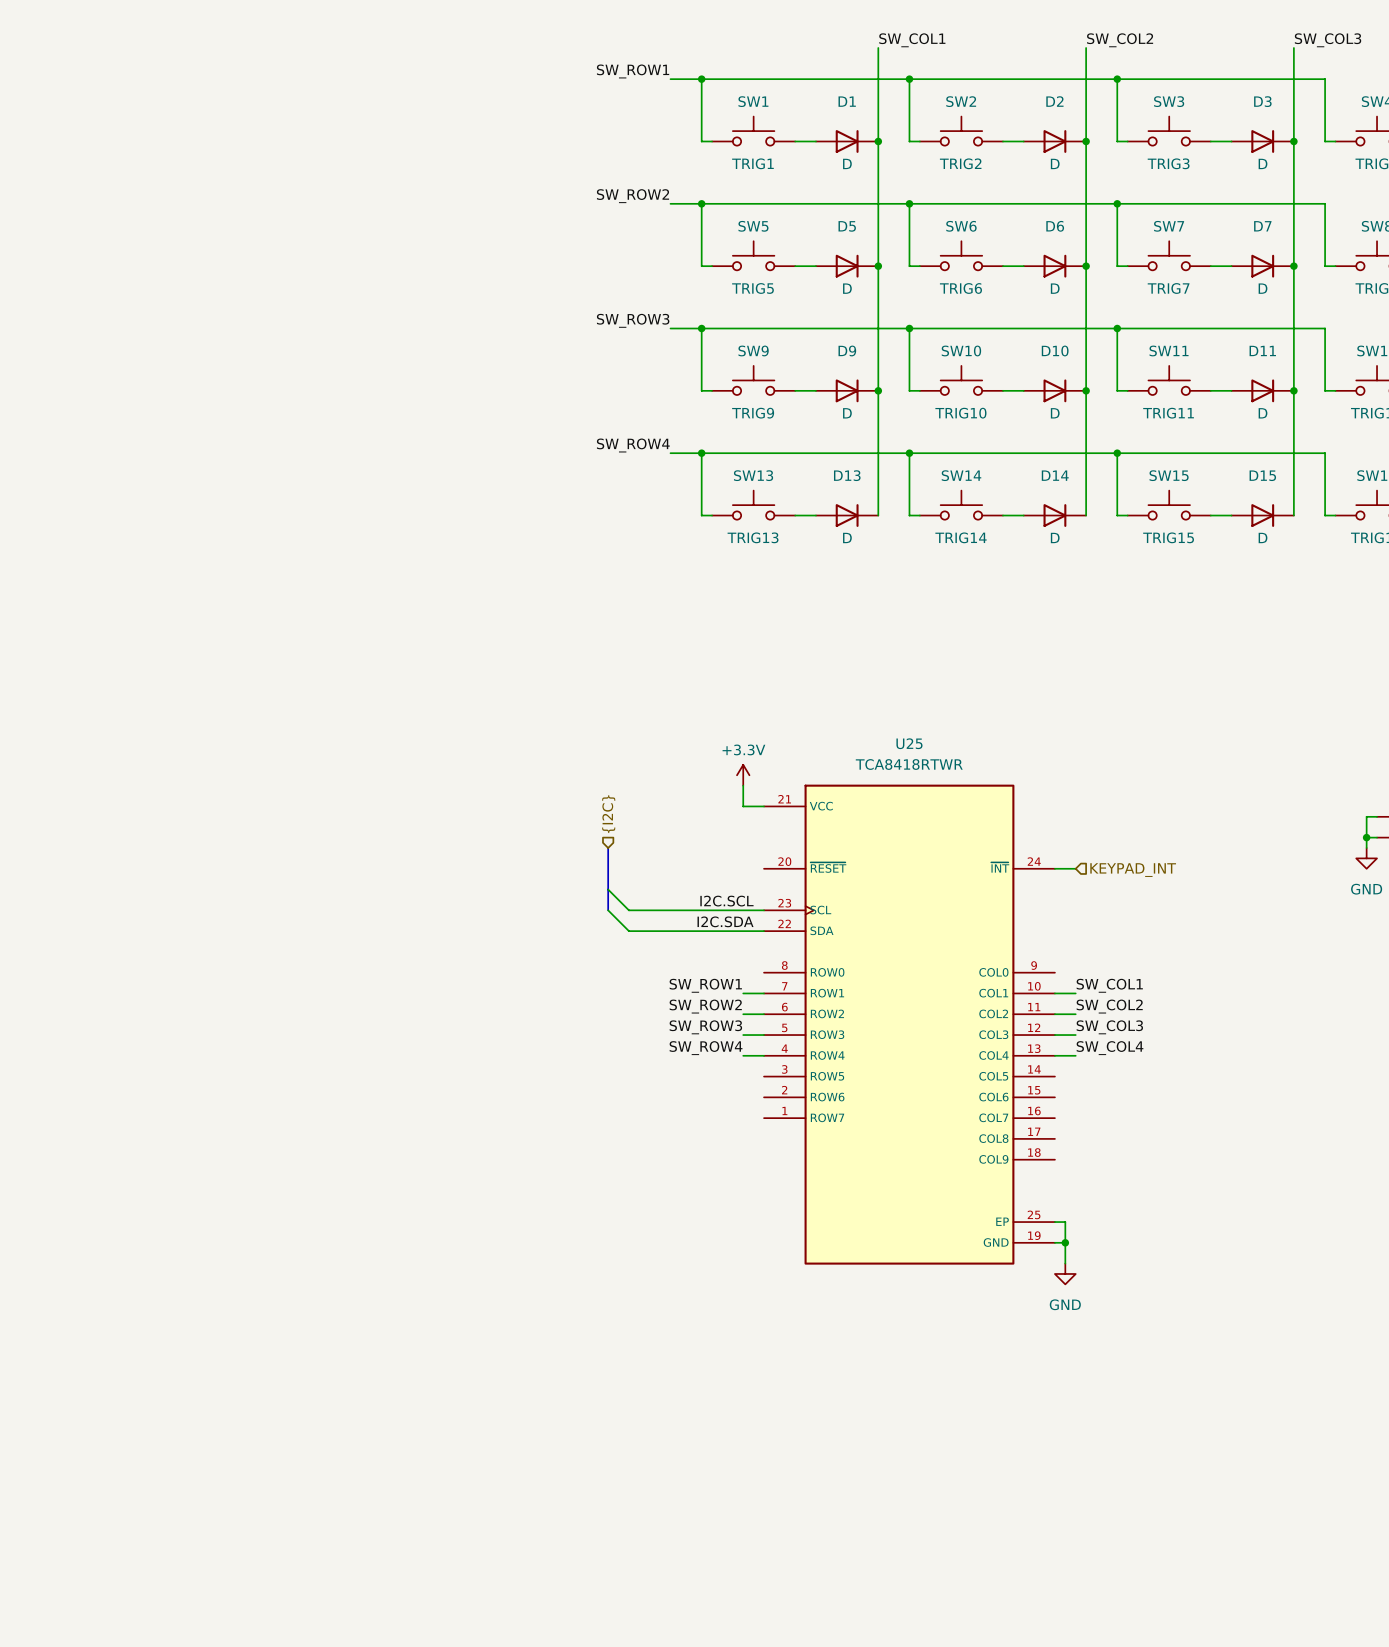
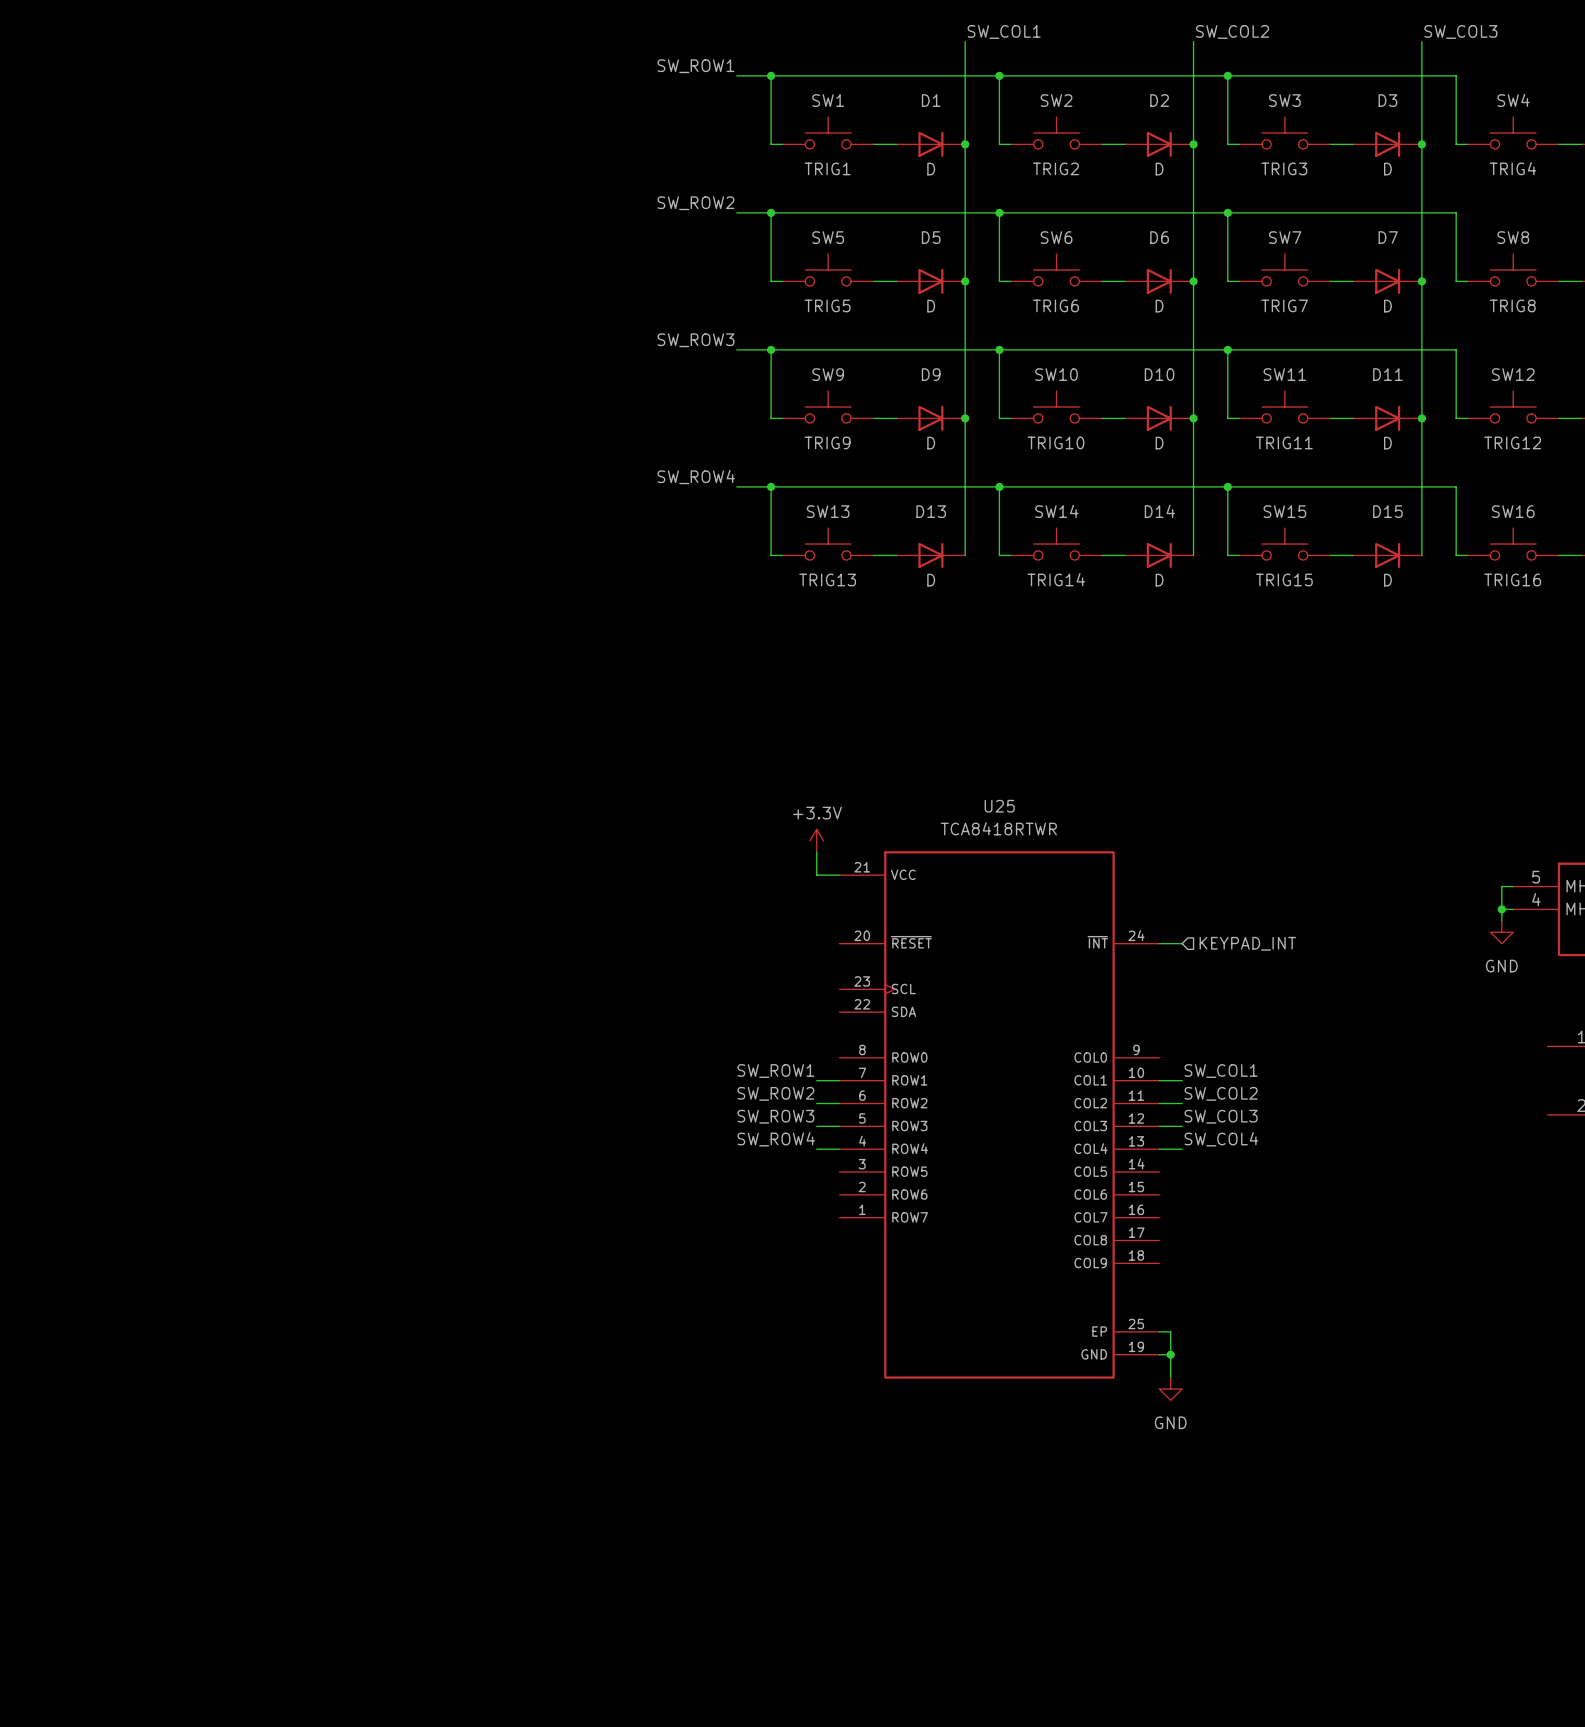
hierarchical label: {I2C} (608, 814) -> none
bus: (608, 848) (608, 910) -> none
wire: (608, 889) (628, 910) (764, 910) -> none
label: I2C.SCL (726, 901) -> none
wire: (608, 910) (628, 931) (764, 931) -> none
label: I2C.SDA (725, 921) -> none

